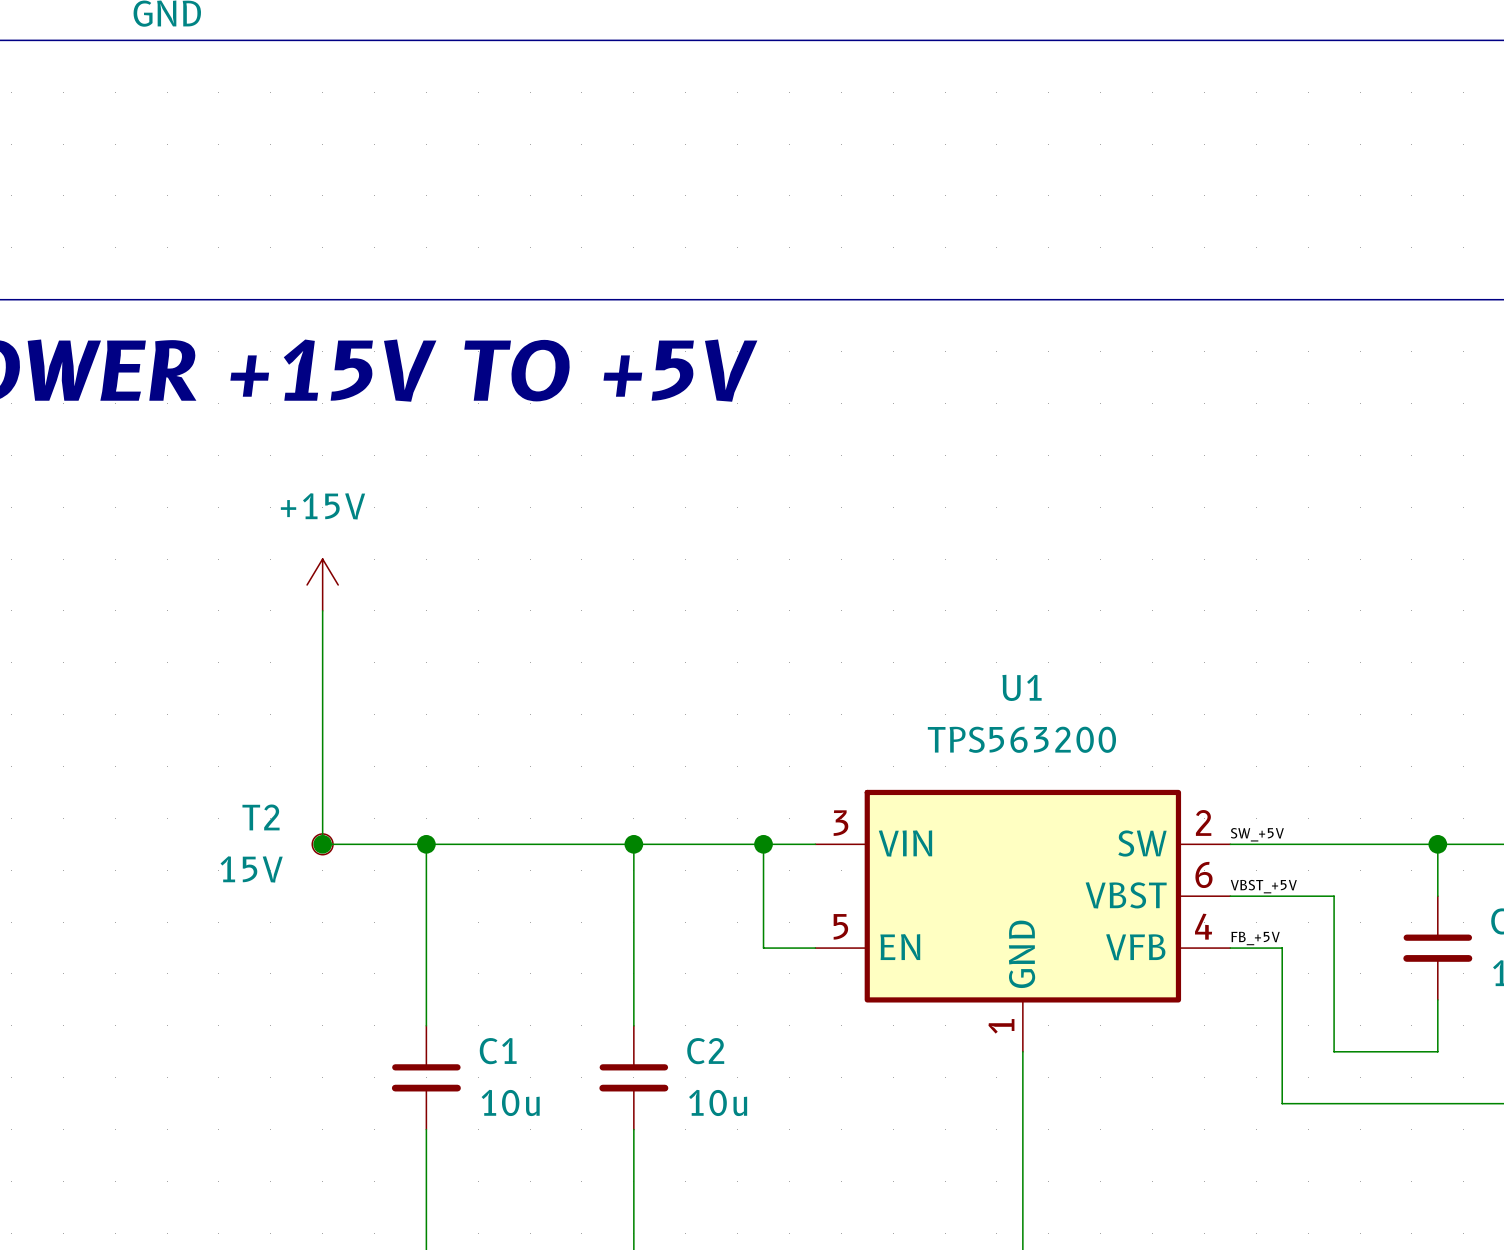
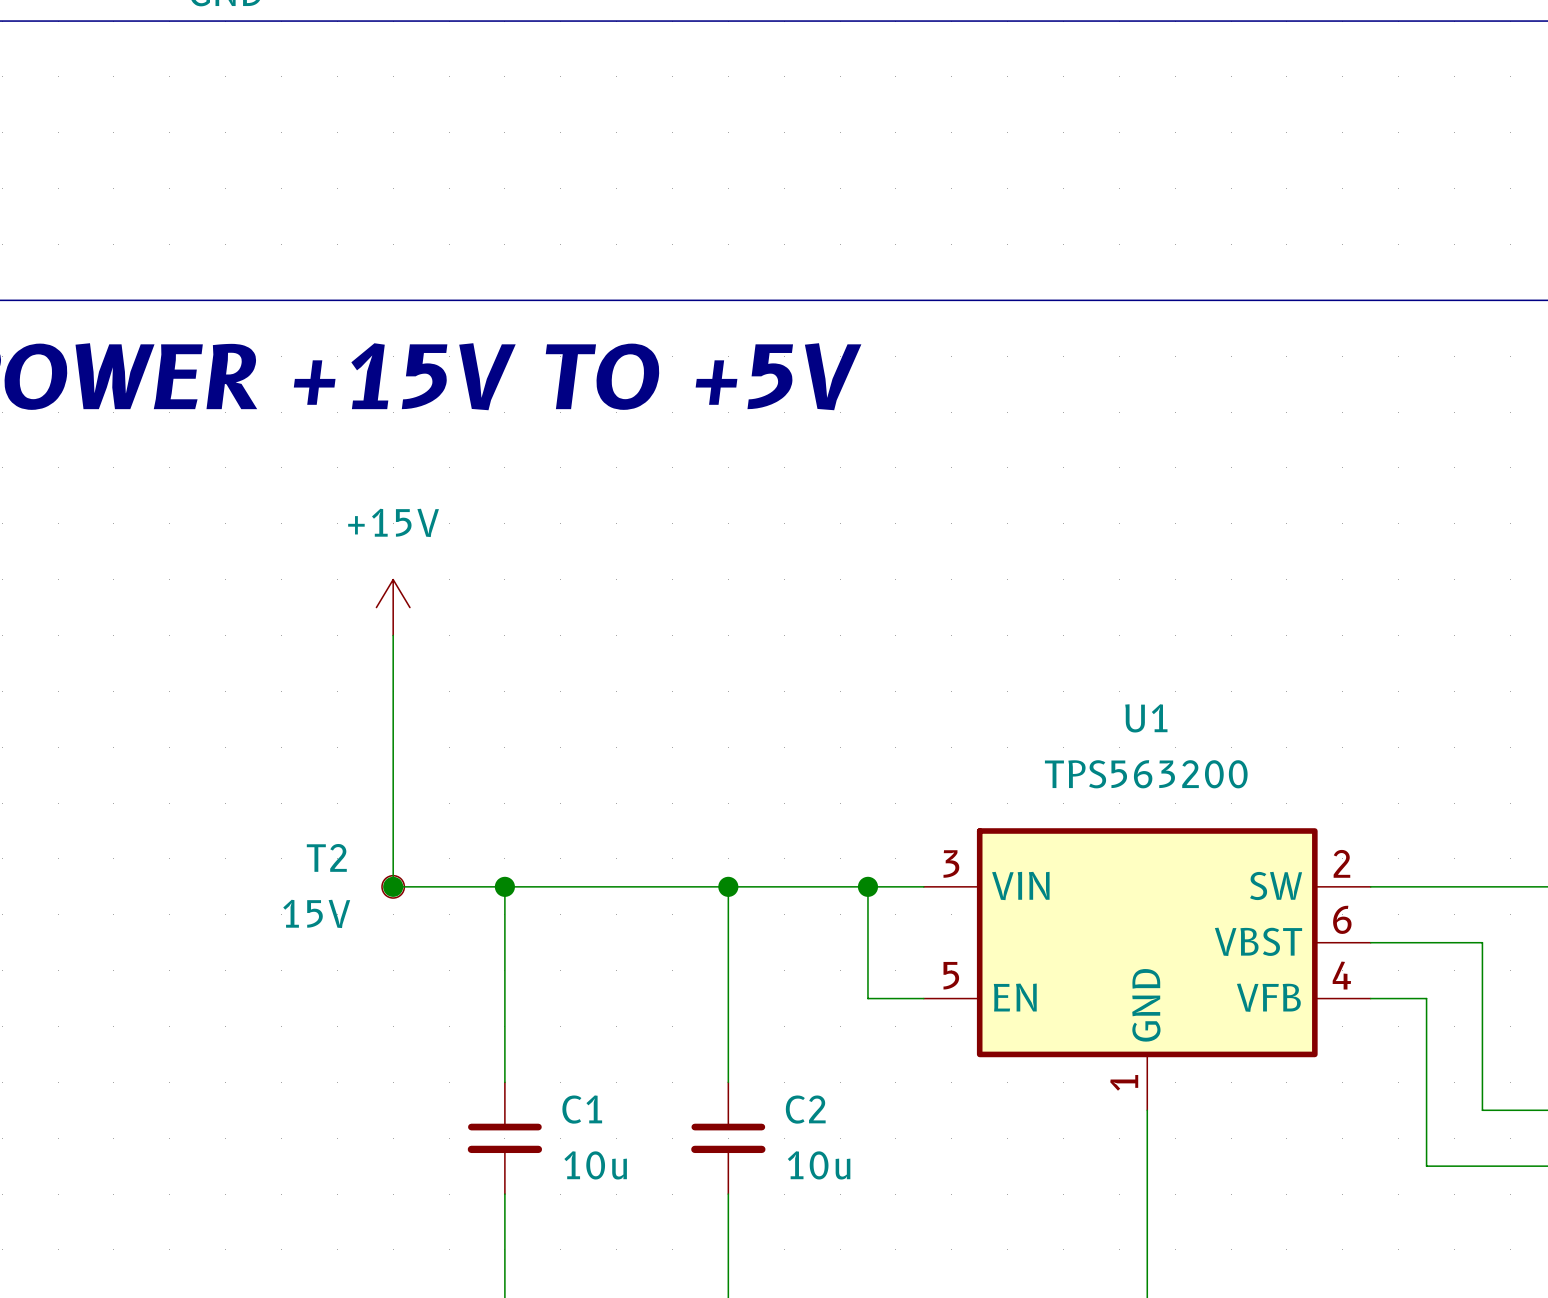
label: SW_+5V (1257, 834) -> none
label: VBST_+5V (1263, 886) -> none
label: FB_+5V (1255, 938) -> none

